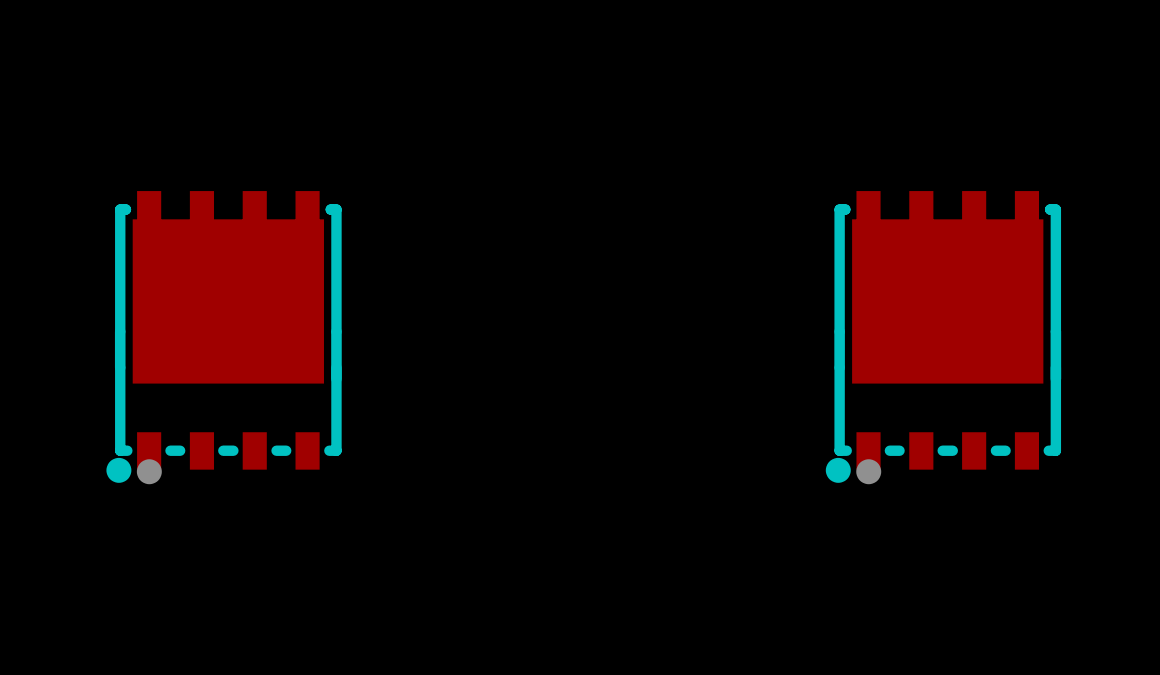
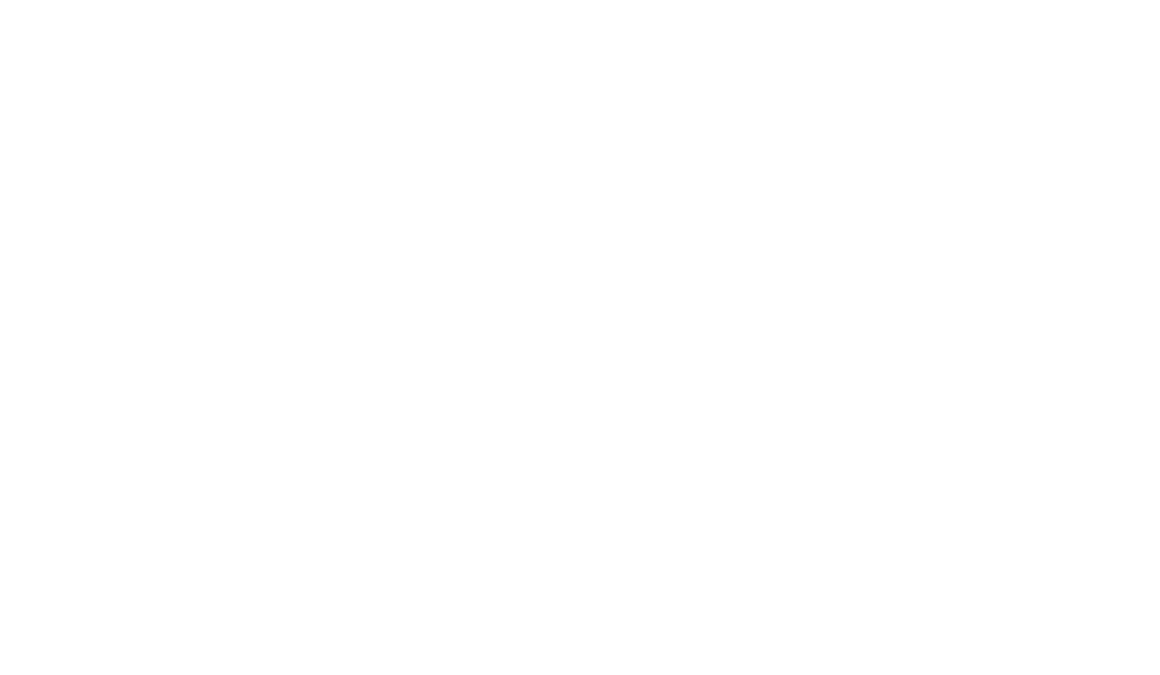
part: (224, 337) -> none
part: (943, 337) -> none

